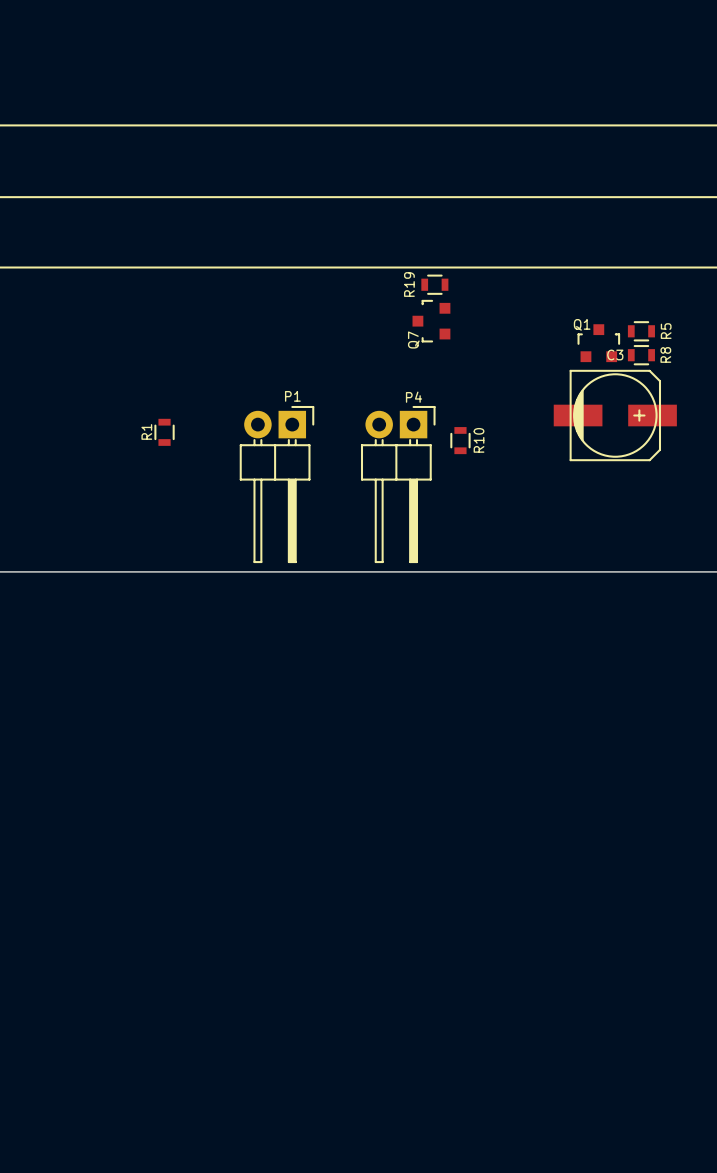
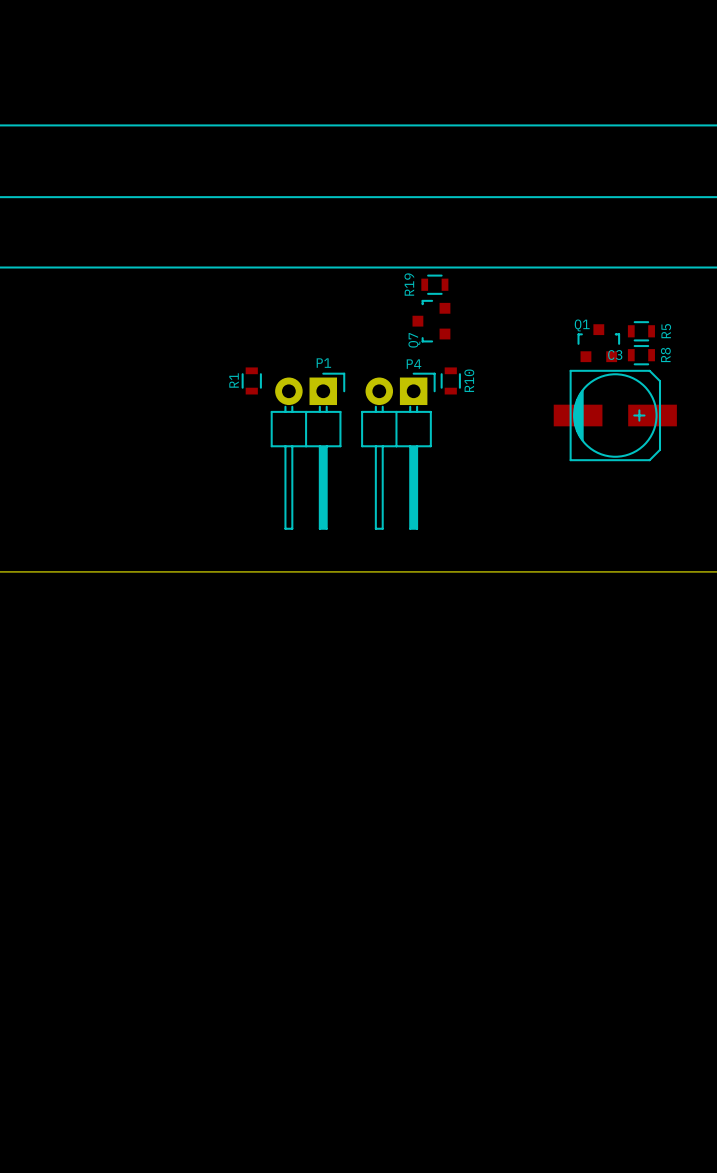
R1 position: (164, 432) -> (251, 380)
R10 position: (460, 440) -> (450, 380)
P1 position: (277, 484) -> (307, 451)
P4 position: (398, 484) -> (398, 451)

